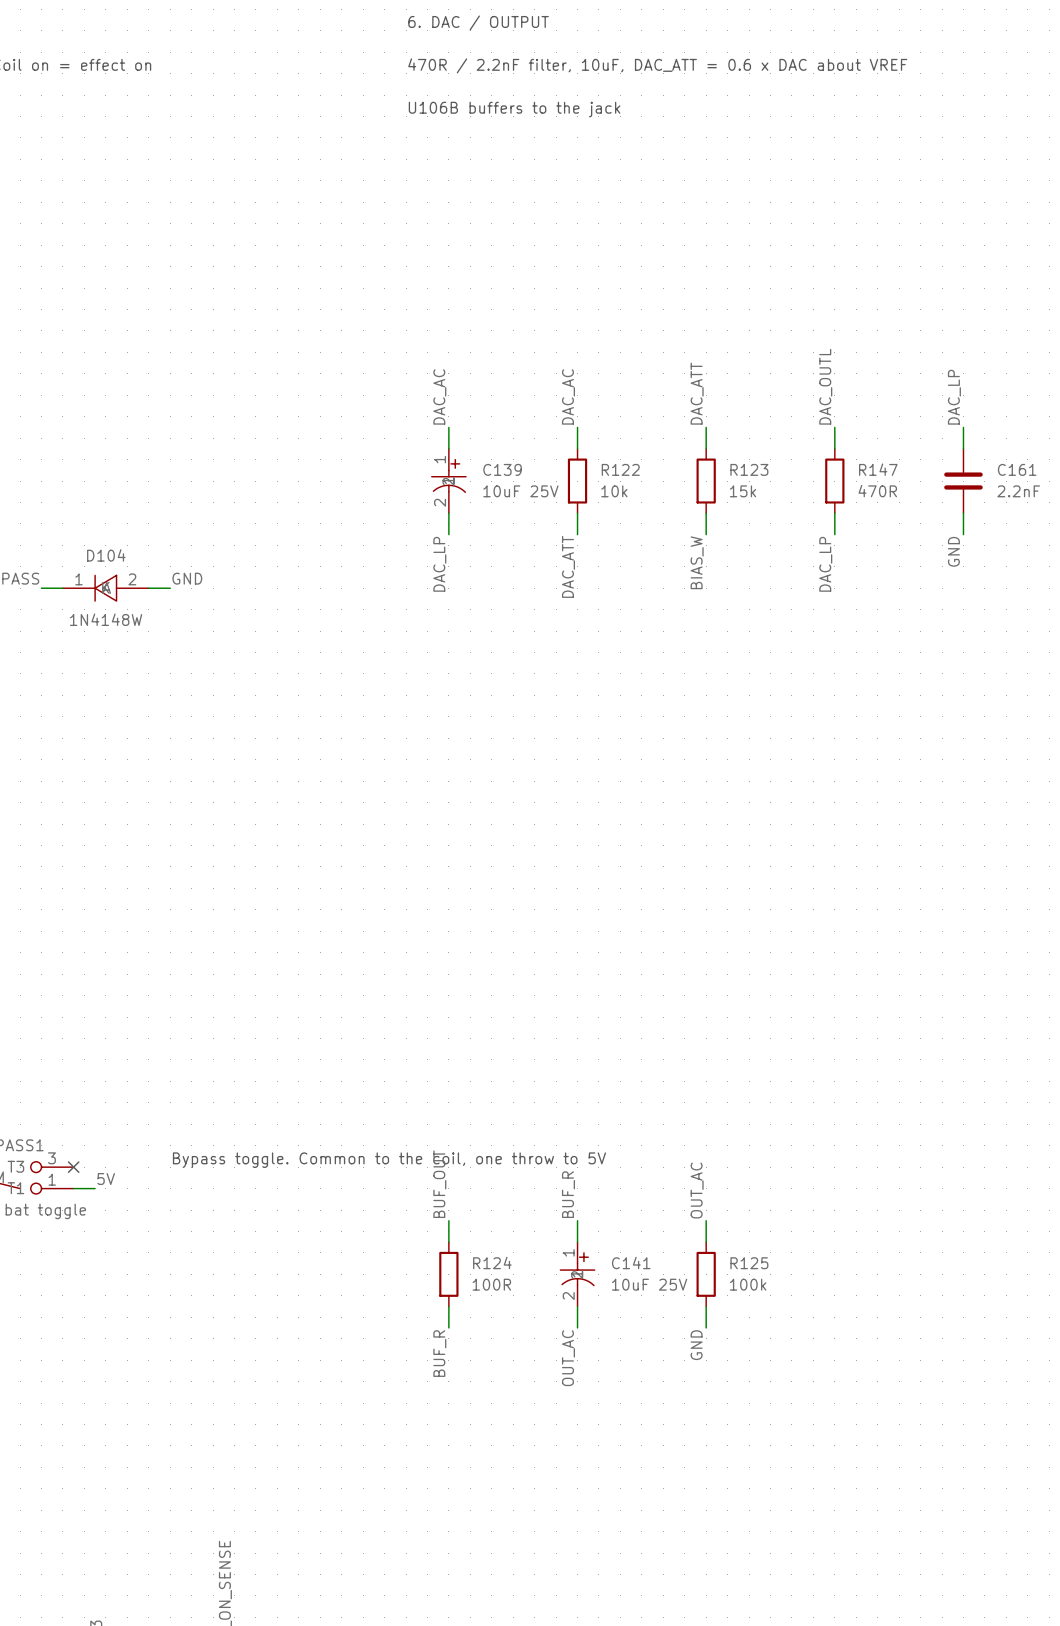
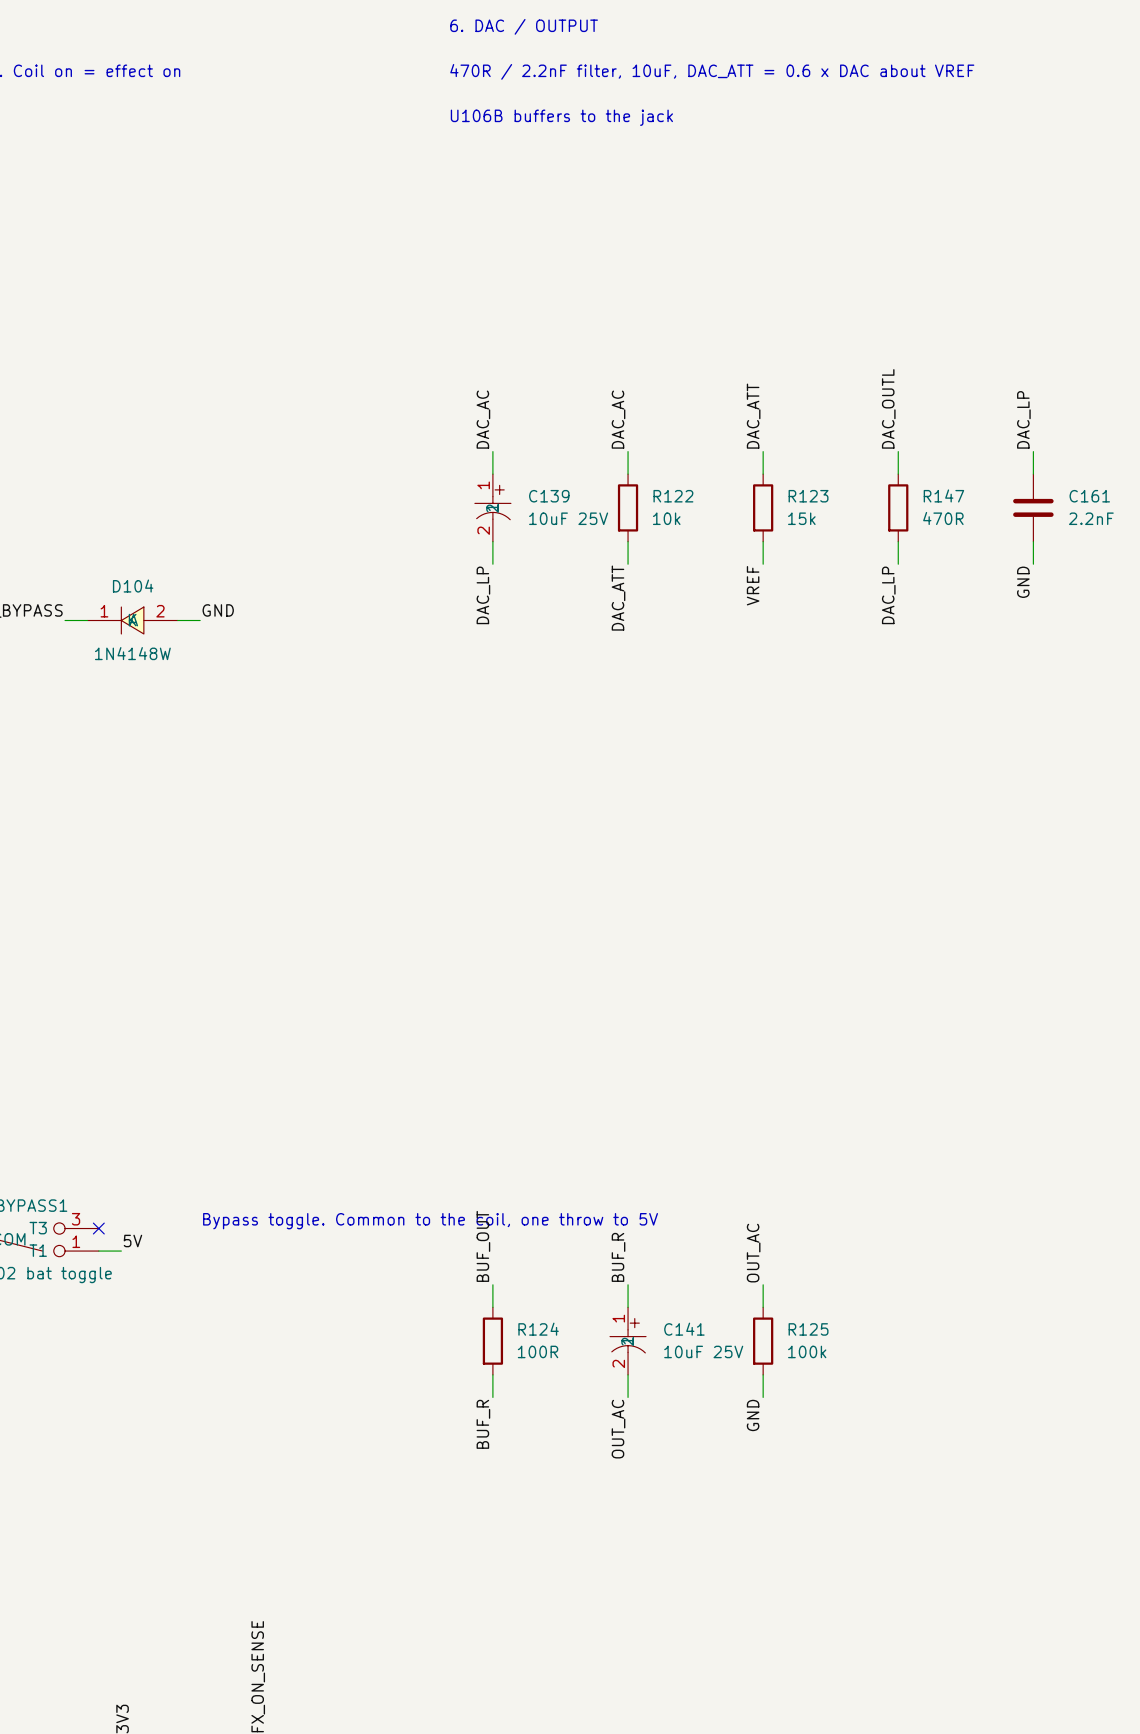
label: BIAS_W (697, 562) -> VREF (753, 585)

